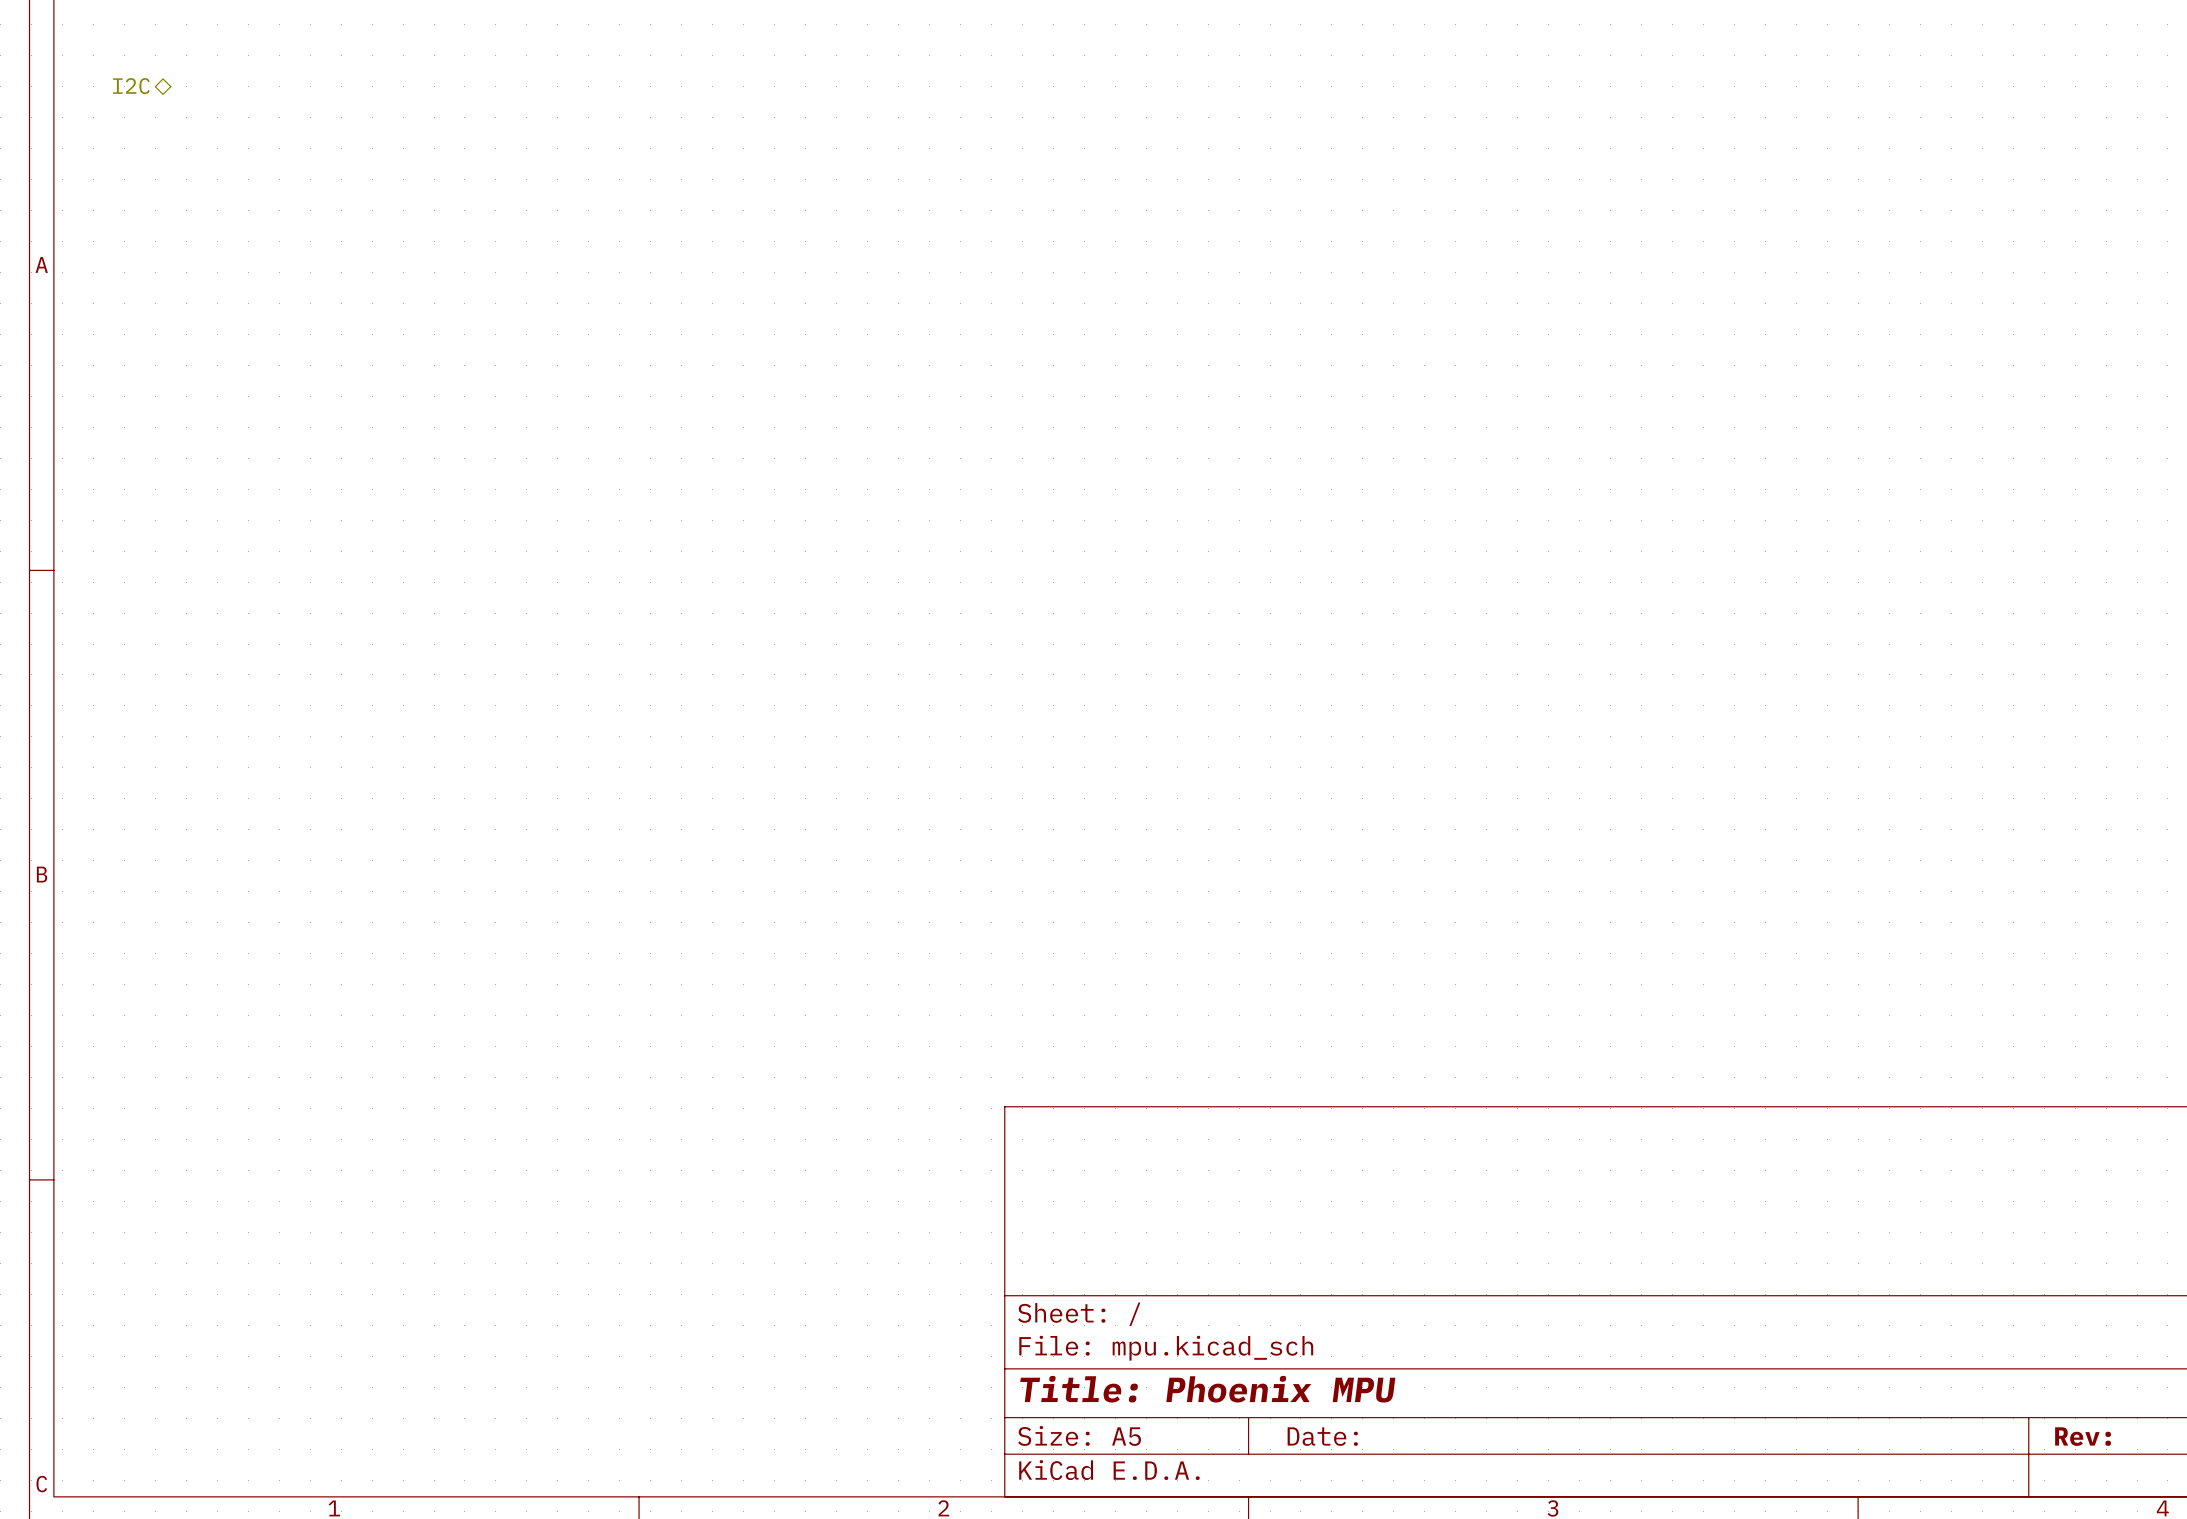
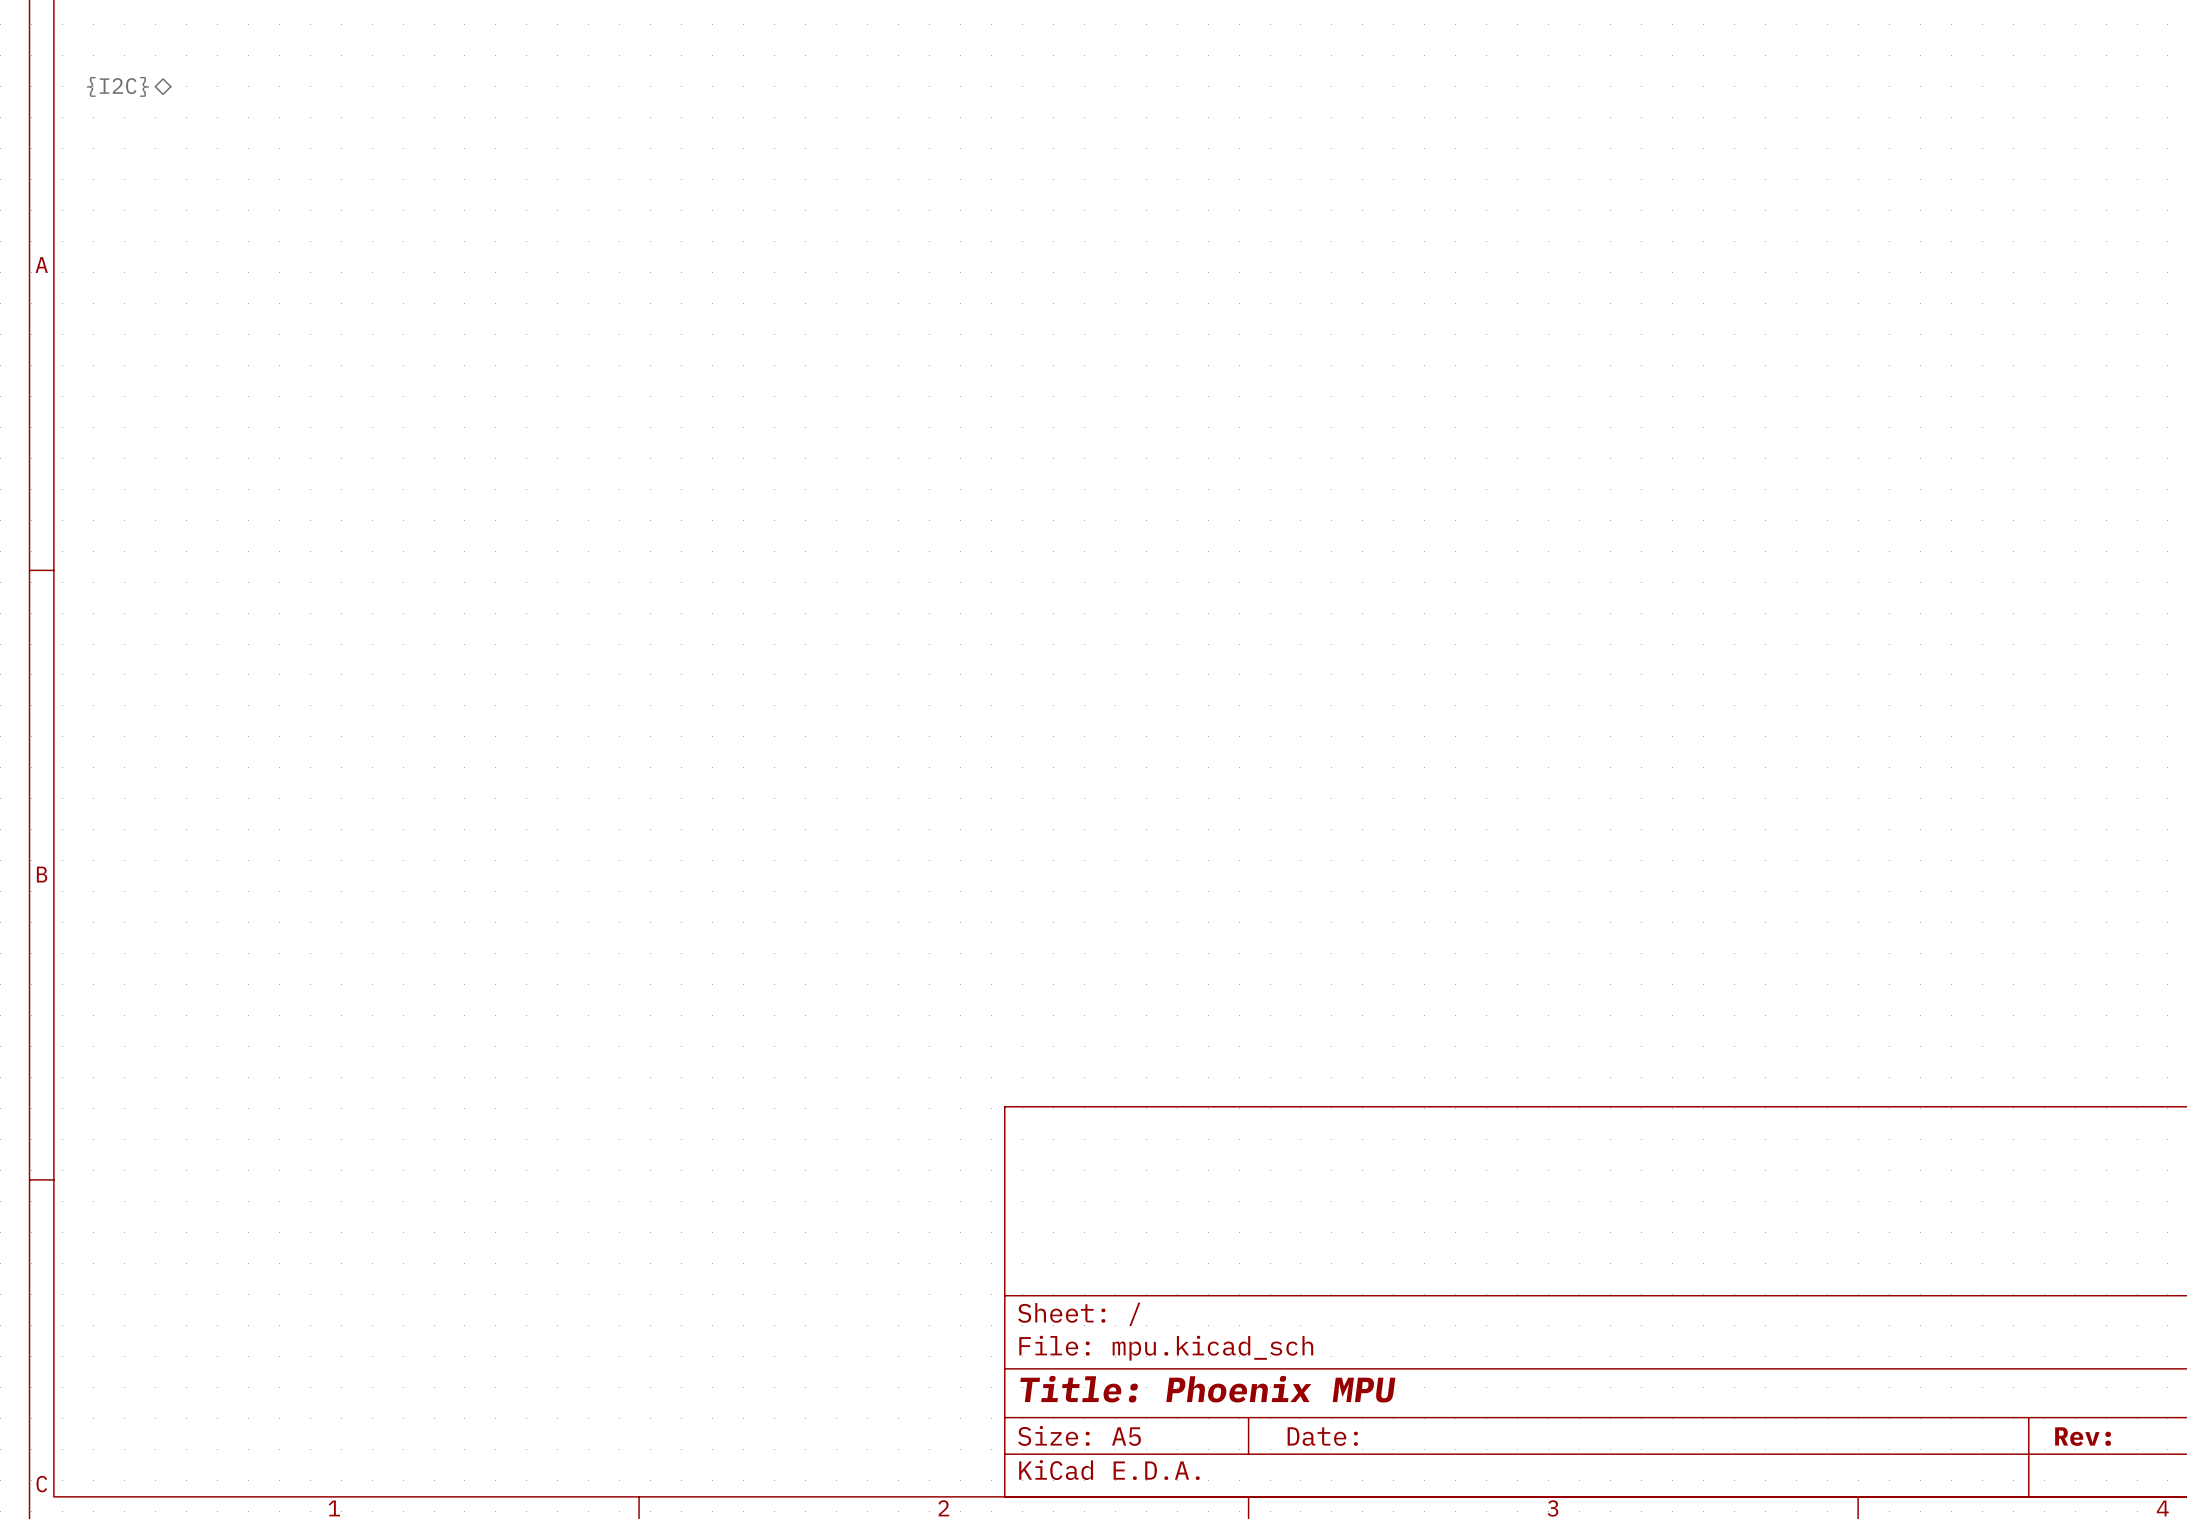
hierarchical label: I2C (131, 86) -> {I2C} (117, 86)

